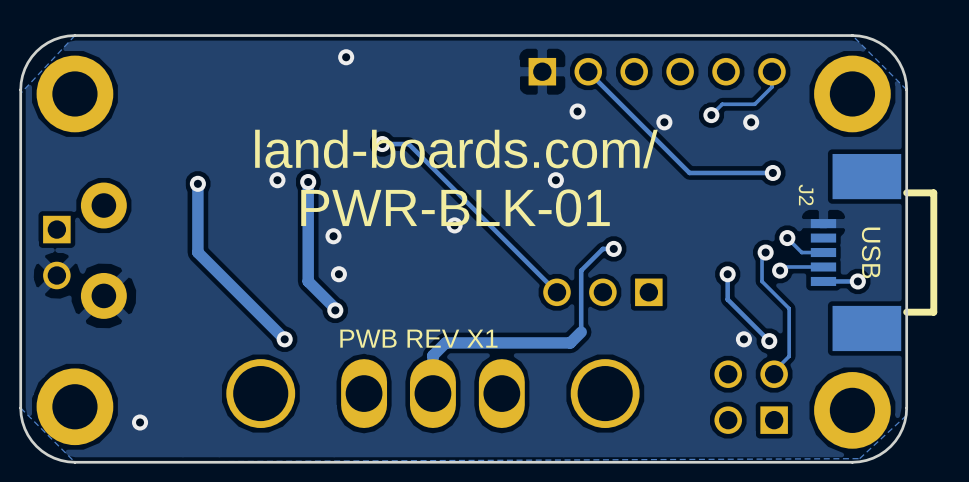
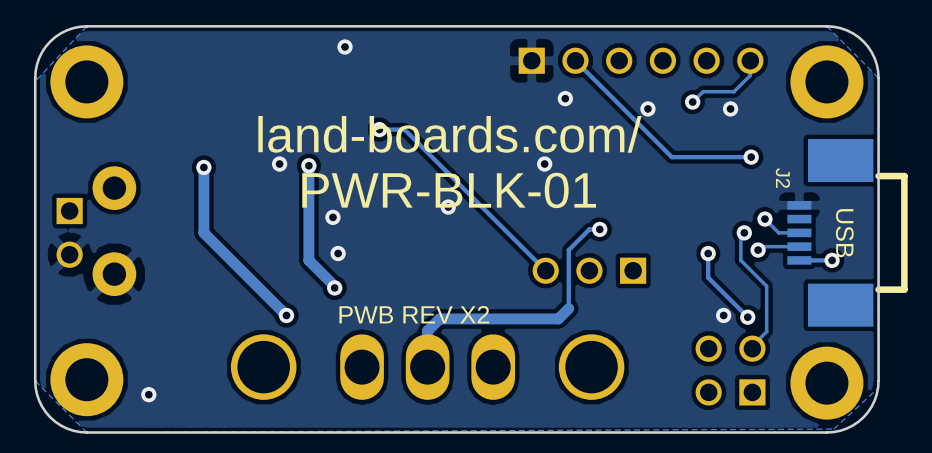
text: PWB REV X1 (418, 338) -> PWB REV X2 (414, 314)

